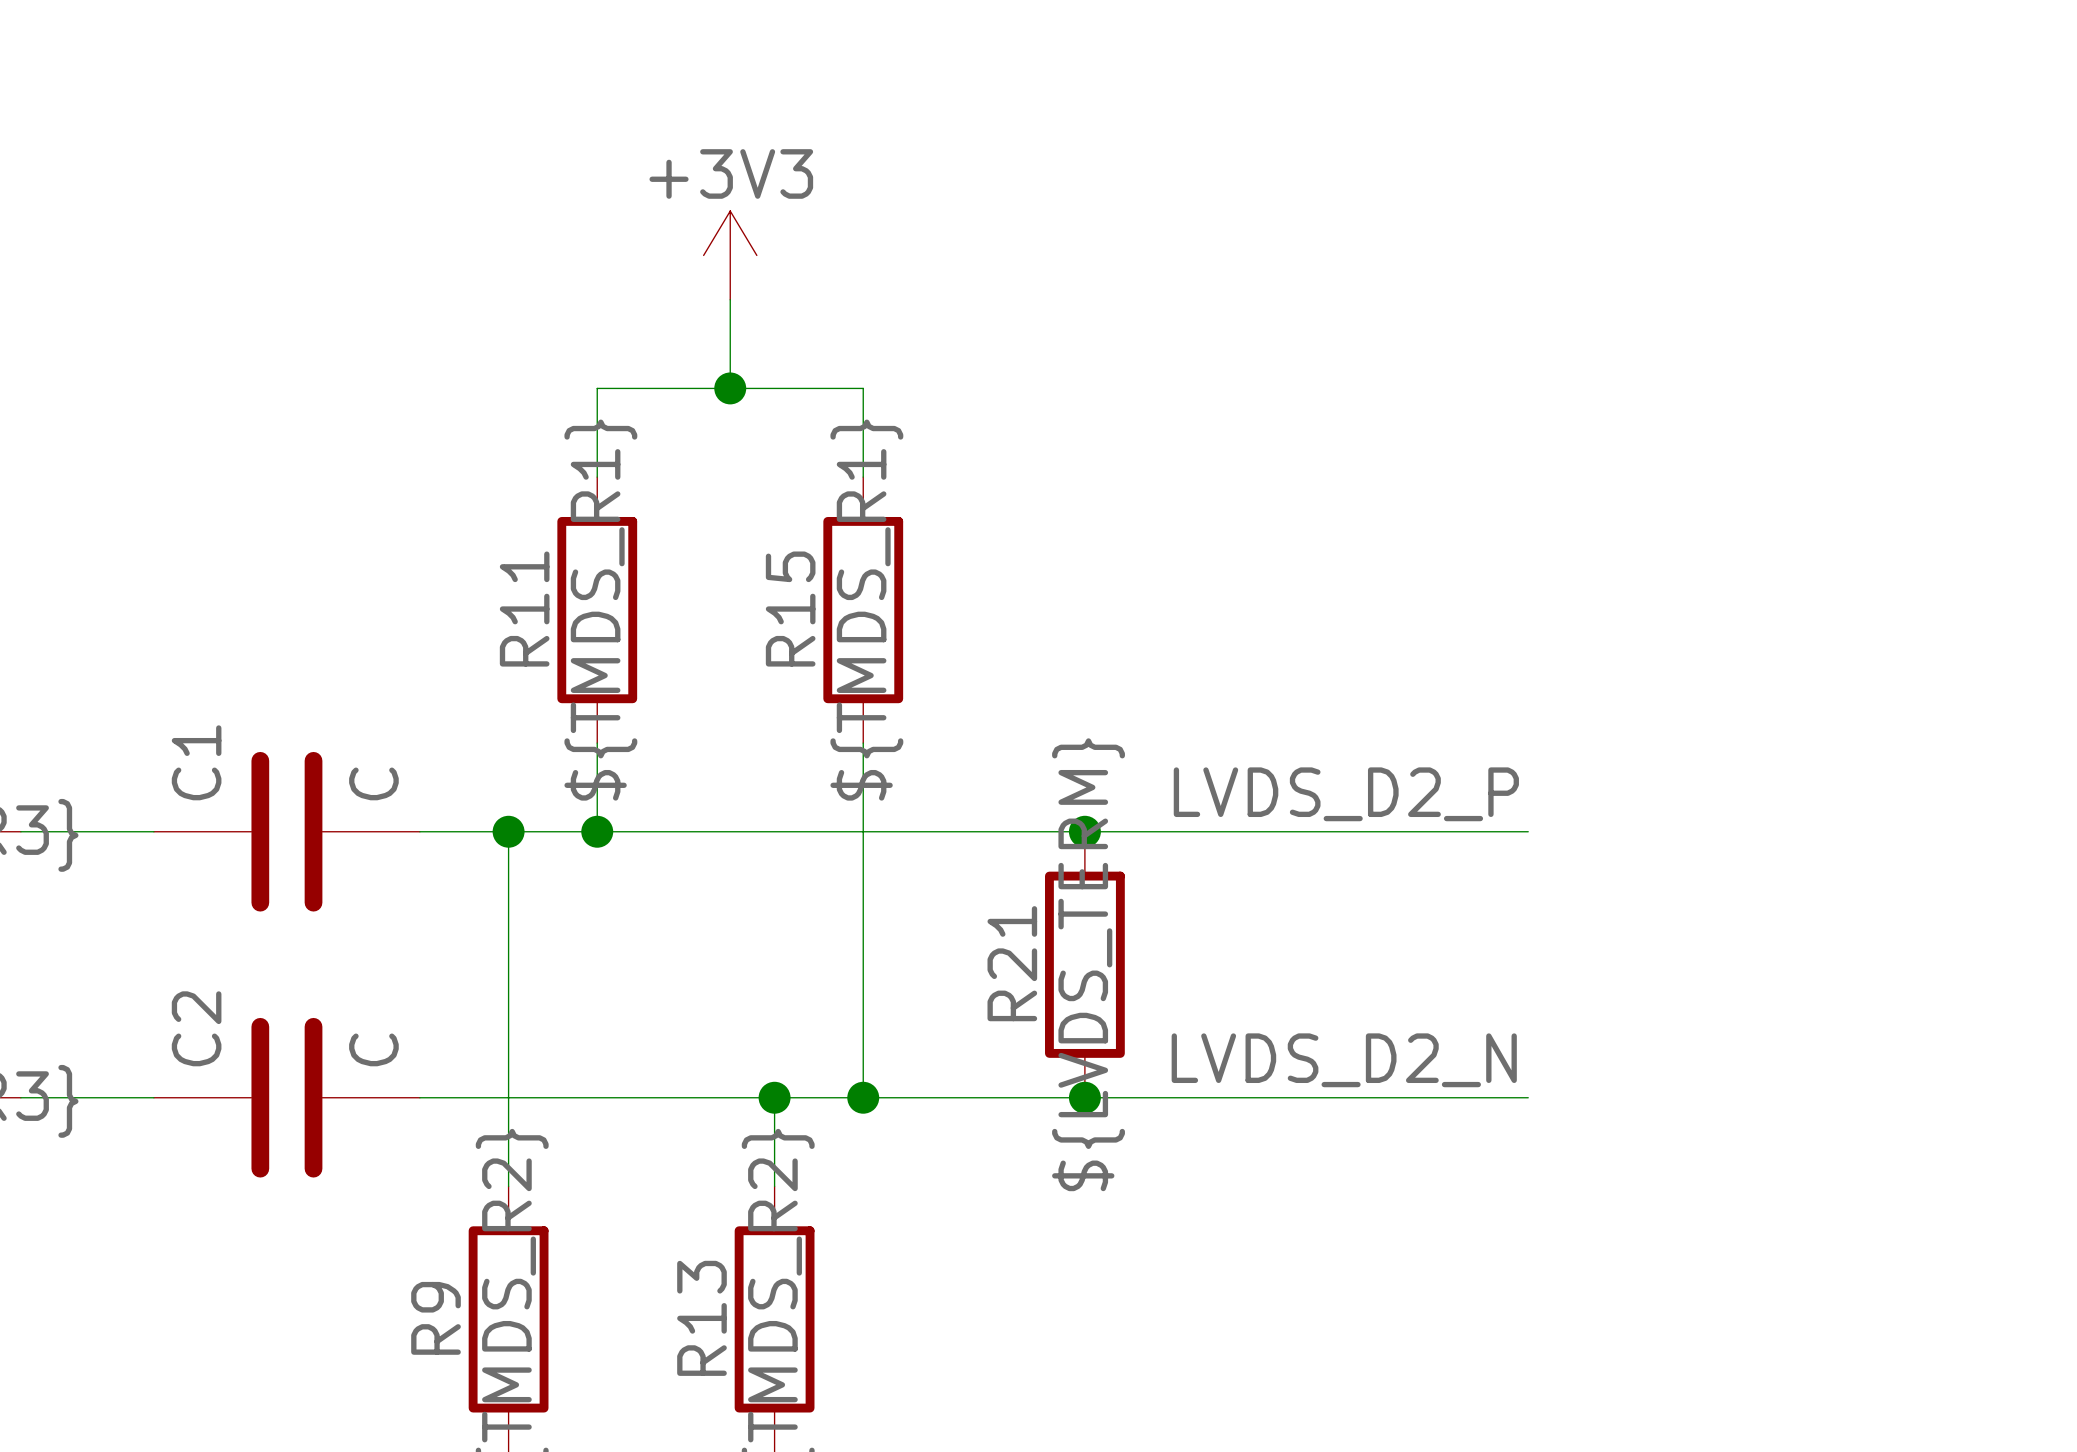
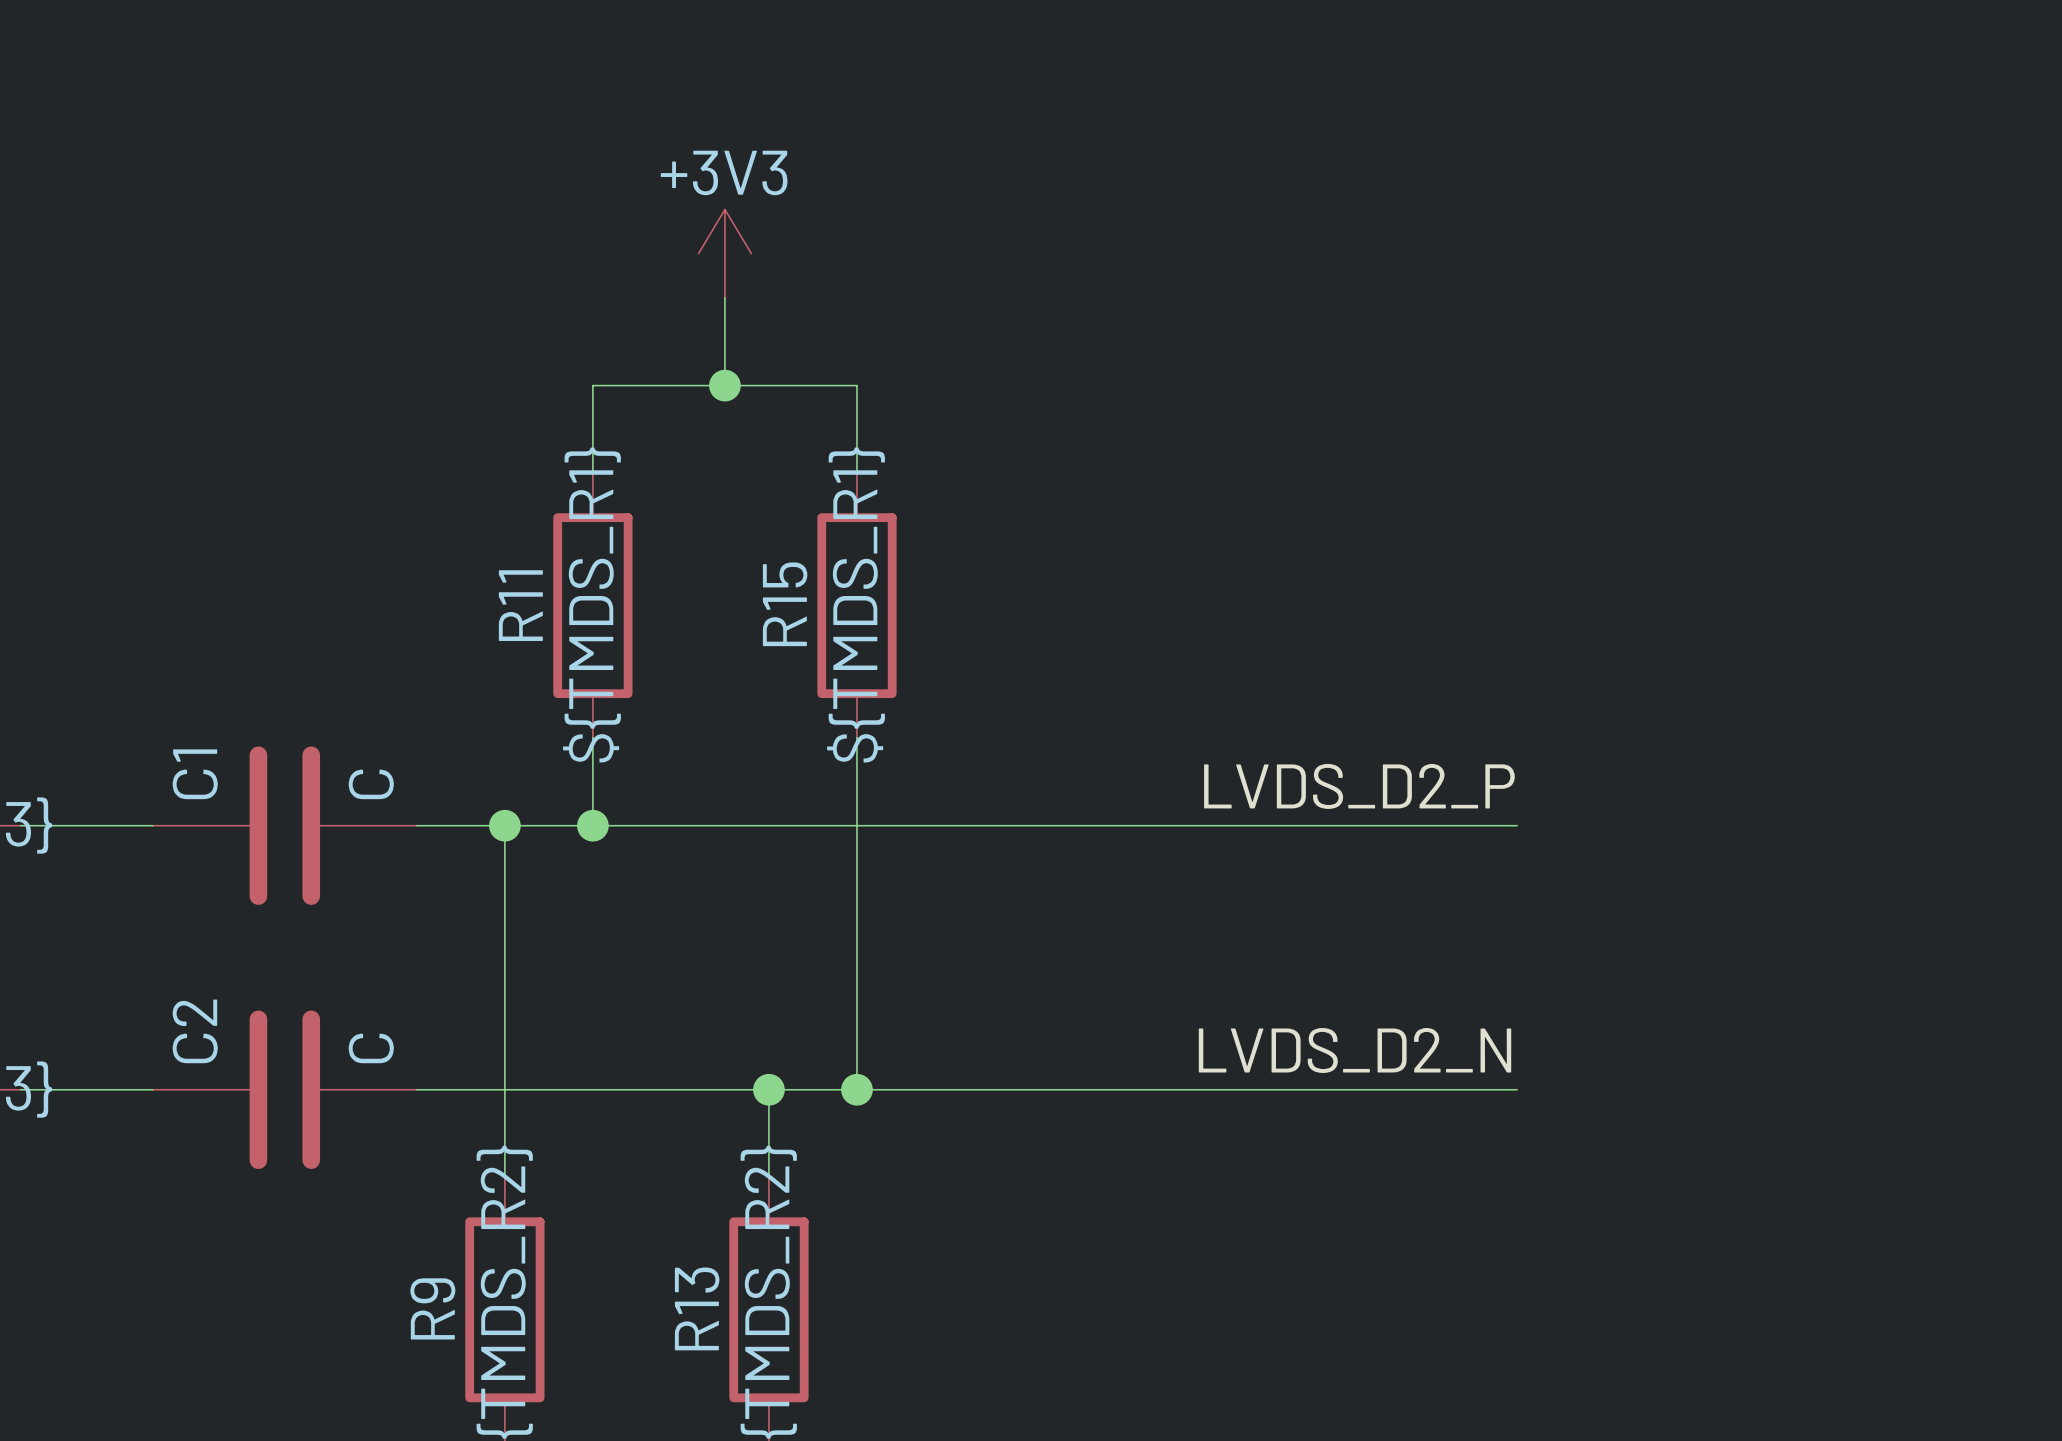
junction: (1084, 831) -> none
R21: ${LVDS_TERM} (1084, 964) -> none
junction: (1084, 1097) -> none

